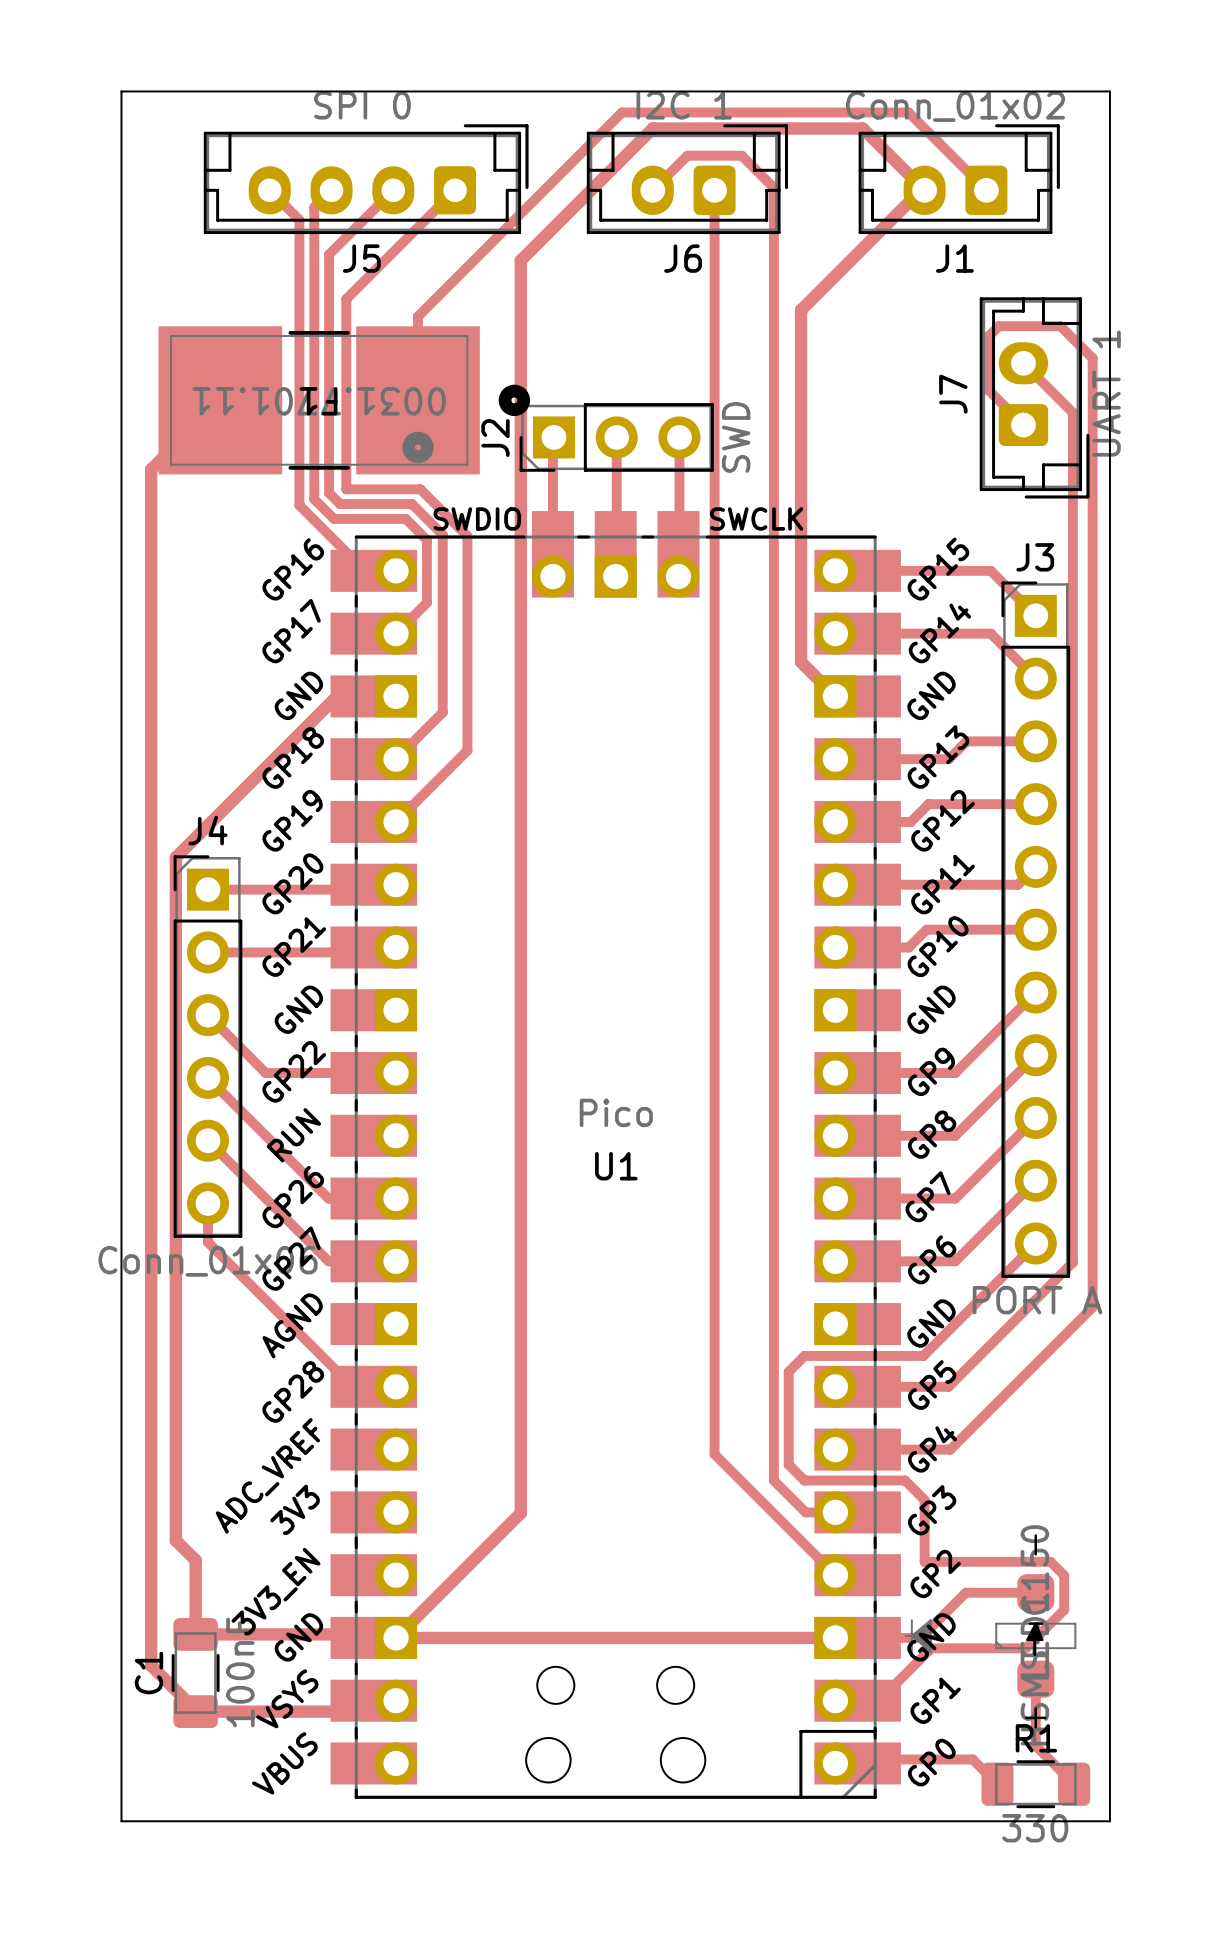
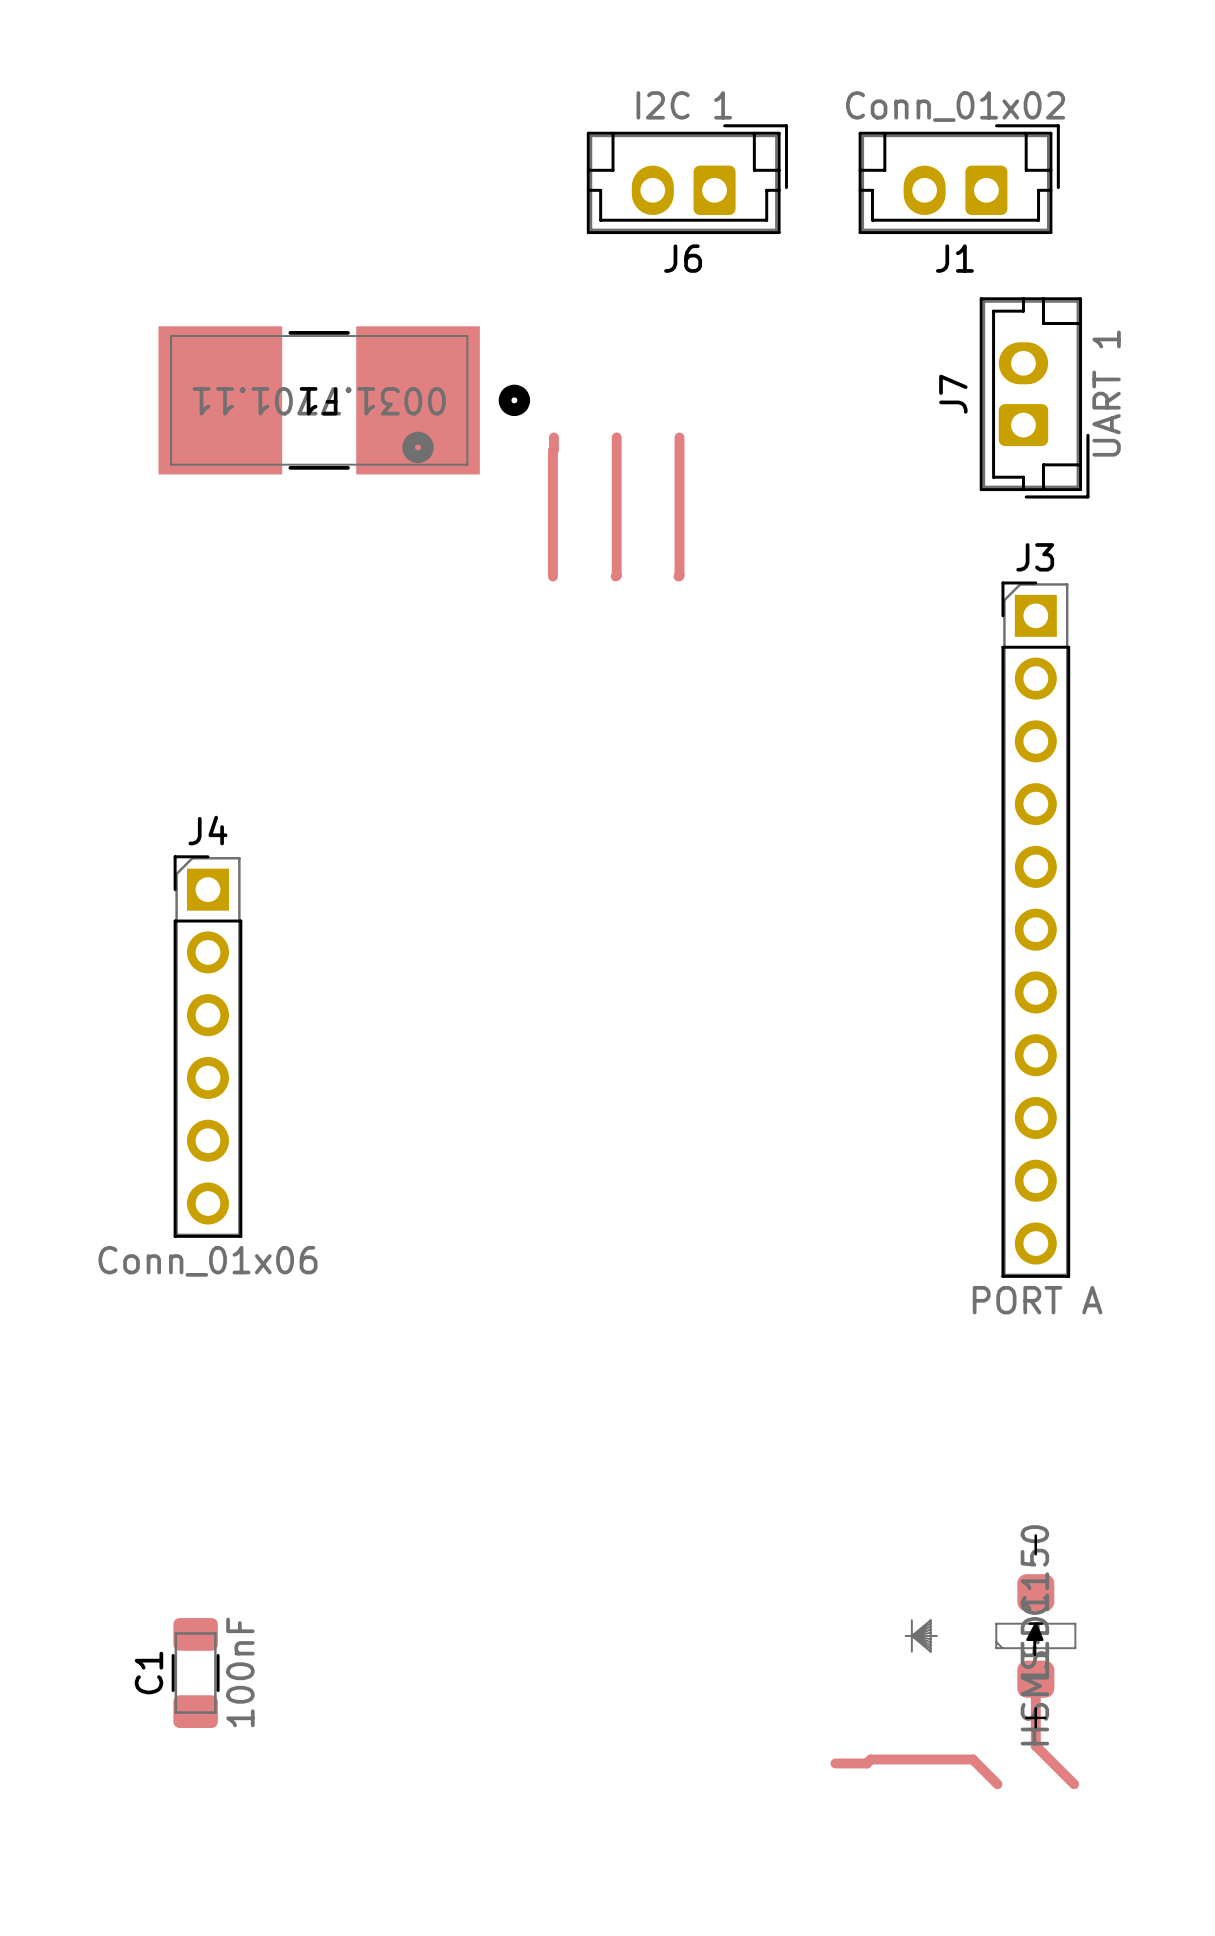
board edge: (121, 91) (1109, 91) (1109, 1821) (121, 1821) (121, 91) -> none
J5: SPI 0 (366, 179) -> none
track: (269, 190) (299, 219) (299, 505) (365, 570) (396, 570) -> none
track: (331, 190) (314, 207) (314, 499) (334, 518) (405, 518) (426, 539) (426, 602) (396, 633) -> none
track: (393, 190) (329, 254) (329, 492) (340, 504) (412, 504) (442, 534) (442, 712) (396, 759) -> none
track: (455, 190) (346, 299) (346, 489) (420, 489) (467, 536) (467, 750) (396, 821) -> none
track: (652, 190) (687, 155) (741, 155) (773, 187) (773, 1480) (805, 1512) (835, 1512) -> none
track: (714, 190) (714, 1454) (835, 1575) -> none
track: (986, 190) (908, 112) (621, 112) (418, 316) (418, 400) -> none
track: (1023, 363) (1072, 412) (1072, 1262) (948, 1386) (835, 1386) -> none
track: (220, 400) (151, 469) (151, 1665) (195, 1711) (385, 1711) (396, 1700) -> none
track: (1023, 425) (988, 390) (988, 336) (998, 326) (1060, 326) (1092, 358) (1092, 1307) (950, 1449) (835, 1449) -> none
J2: SWD (616, 437) -> none
track: (835, 570) (990, 570) (1035, 615) -> none
track: (835, 633) (990, 633) (1035, 678) -> none
track: (396, 696) (336, 696) (175, 857) (175, 1540) (195, 1560) (195, 1634) (392, 1634) (396, 1637) -> none
track: (835, 696) (801, 662) (801, 310) (920, 190) (924, 190) (862, 128) (652, 128) (520, 260) (520, 1513) (396, 1637) -> none
track: (1035, 741) (966, 741) (948, 759) (835, 759) -> none
track: (1035, 804) (928, 804) (910, 821) (835, 821) -> none
track: (1035, 866) (1018, 884) (835, 884) -> none
track: (396, 884) (391, 889) (207, 889) -> none
track: (1035, 929) (926, 929) (908, 947) (835, 947) -> none
track: (396, 947) (391, 952) (207, 952) -> none
track: (1035, 992) (955, 1073) (835, 1073) -> none
track: (207, 1015) (265, 1073) (396, 1073) -> none
track: (1035, 1055) (955, 1135) (835, 1135) -> none
track: (207, 1077) (328, 1198) (396, 1198) -> none
track: (1035, 1117) (955, 1198) (835, 1198) -> none
track: (207, 1140) (328, 1261) (396, 1261) -> none
U1: Pico (615, 1154) -> none
track: (1035, 1180) (955, 1261) (835, 1261) -> none
track: (207, 1203) (207, 1242) (352, 1386) (396, 1386) -> none
track: (1035, 1243) (923, 1355) (804, 1355) (788, 1371) (788, 1464) (804, 1480) (905, 1480) (924, 1500) (924, 1561) (1050, 1561) (1064, 1575) (1064, 1609) (1025, 1648) (931, 1648) (878, 1700) (835, 1700) -> none
track: (1035, 1592) (965, 1592) (920, 1637) (396, 1637) -> none
R1: 330 (1035, 1784) -> none

